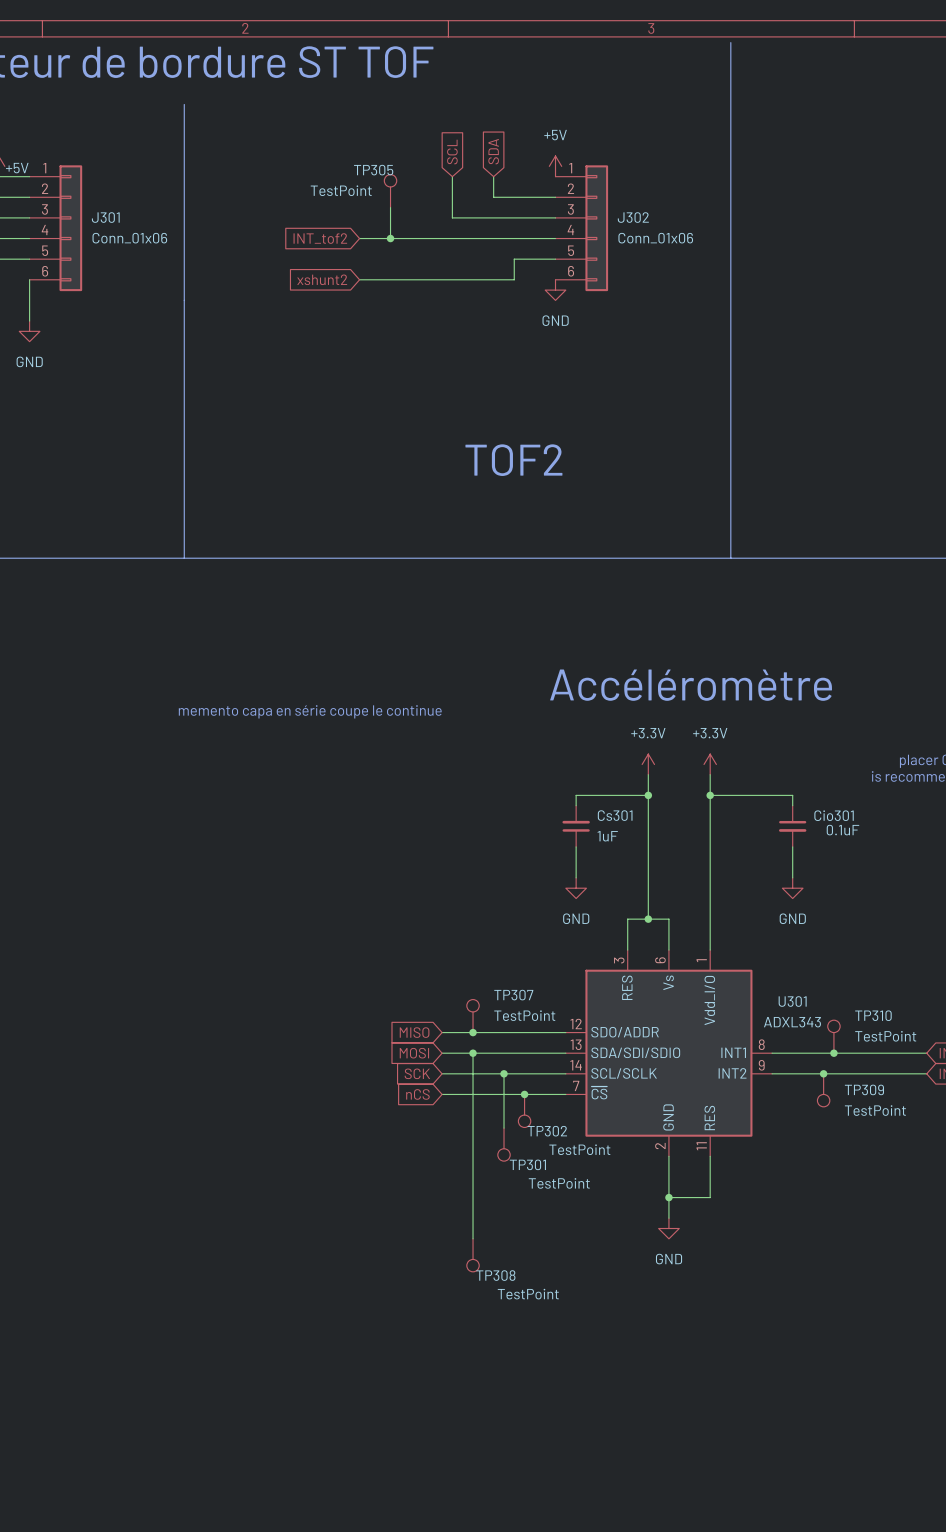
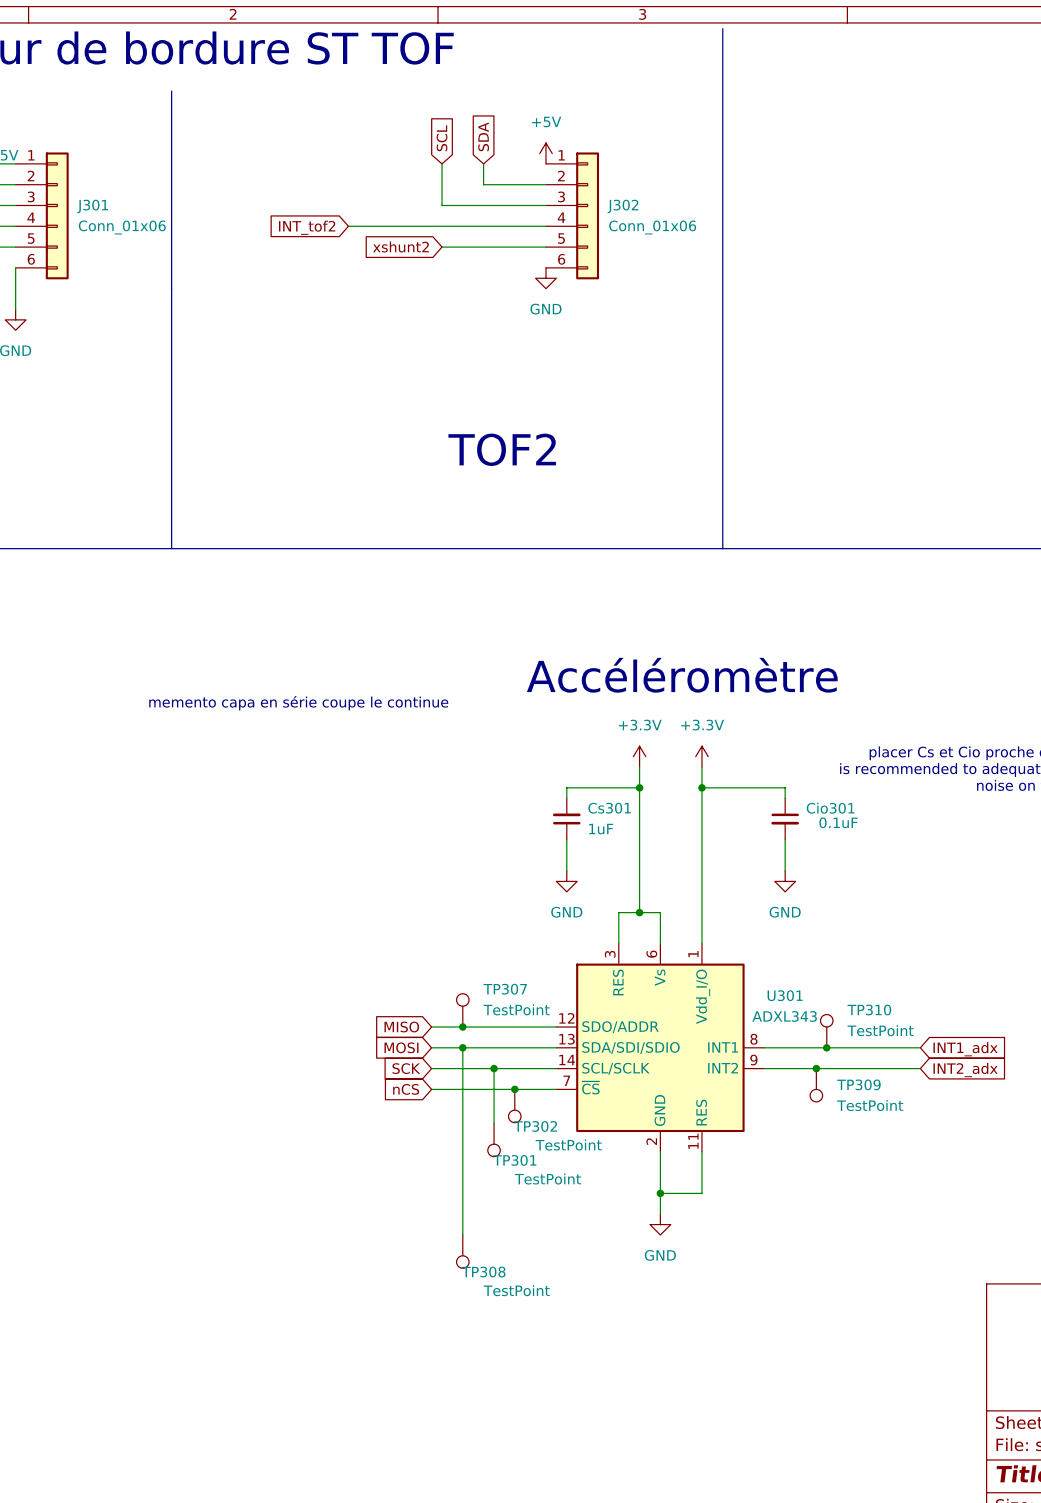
TP305: TestPoint (390, 191) -> none
wire: (390, 207) (390, 238) -> none
junction: (390, 238) -> none
wire: (514, 259) (514, 279) (359, 279) -> (504, 247) (442, 247)
global label position: xshunt2 (322, 279) -> xshunt2 (400, 246)

